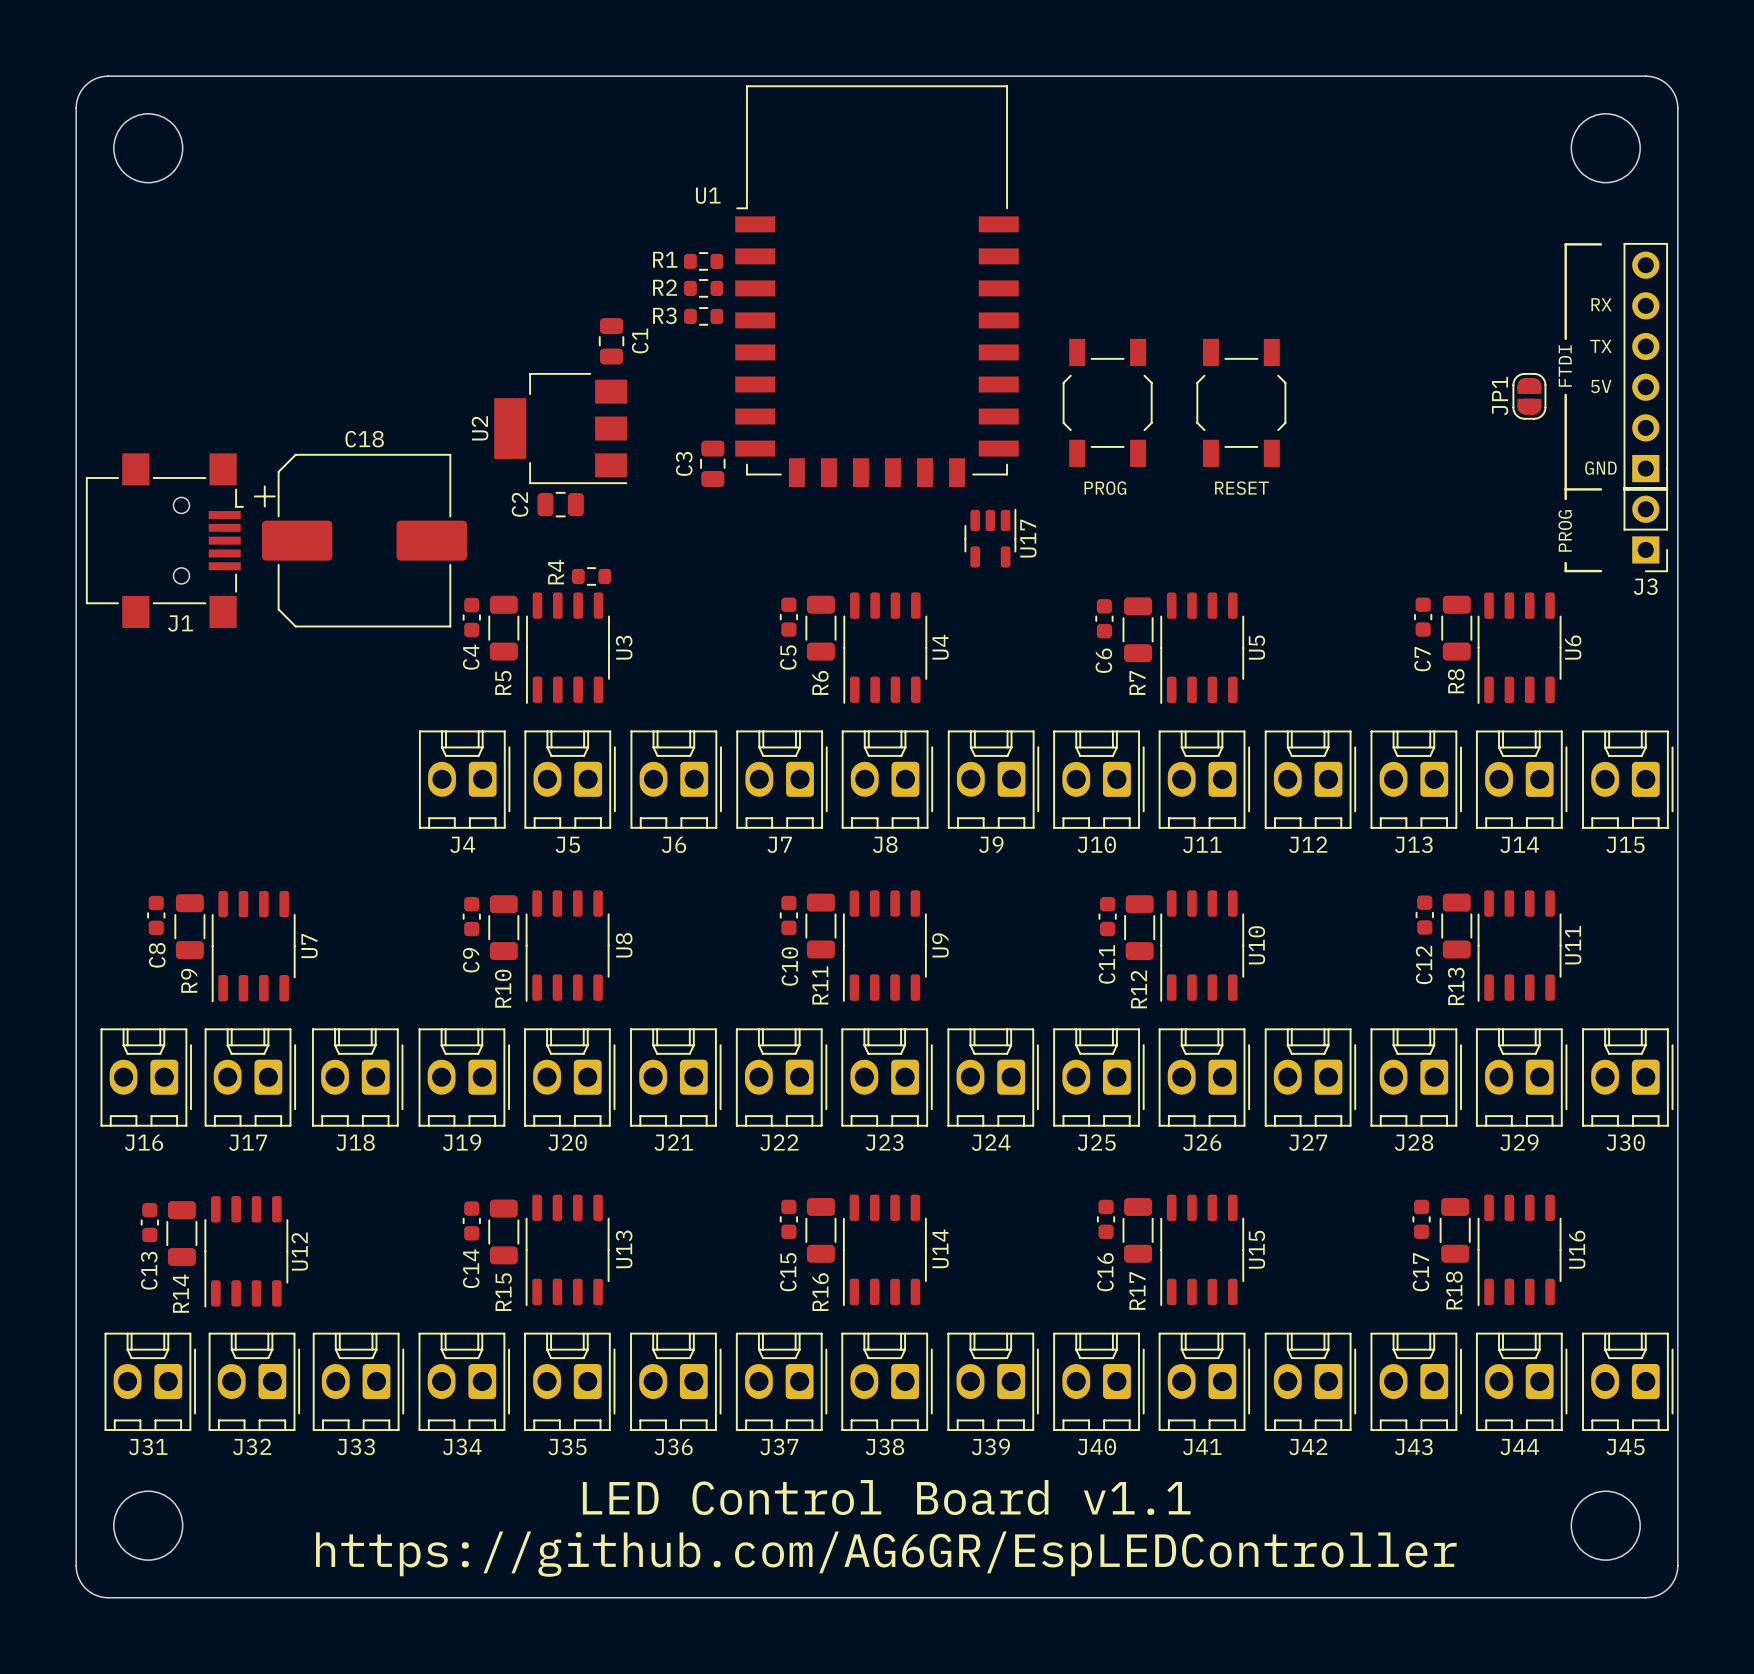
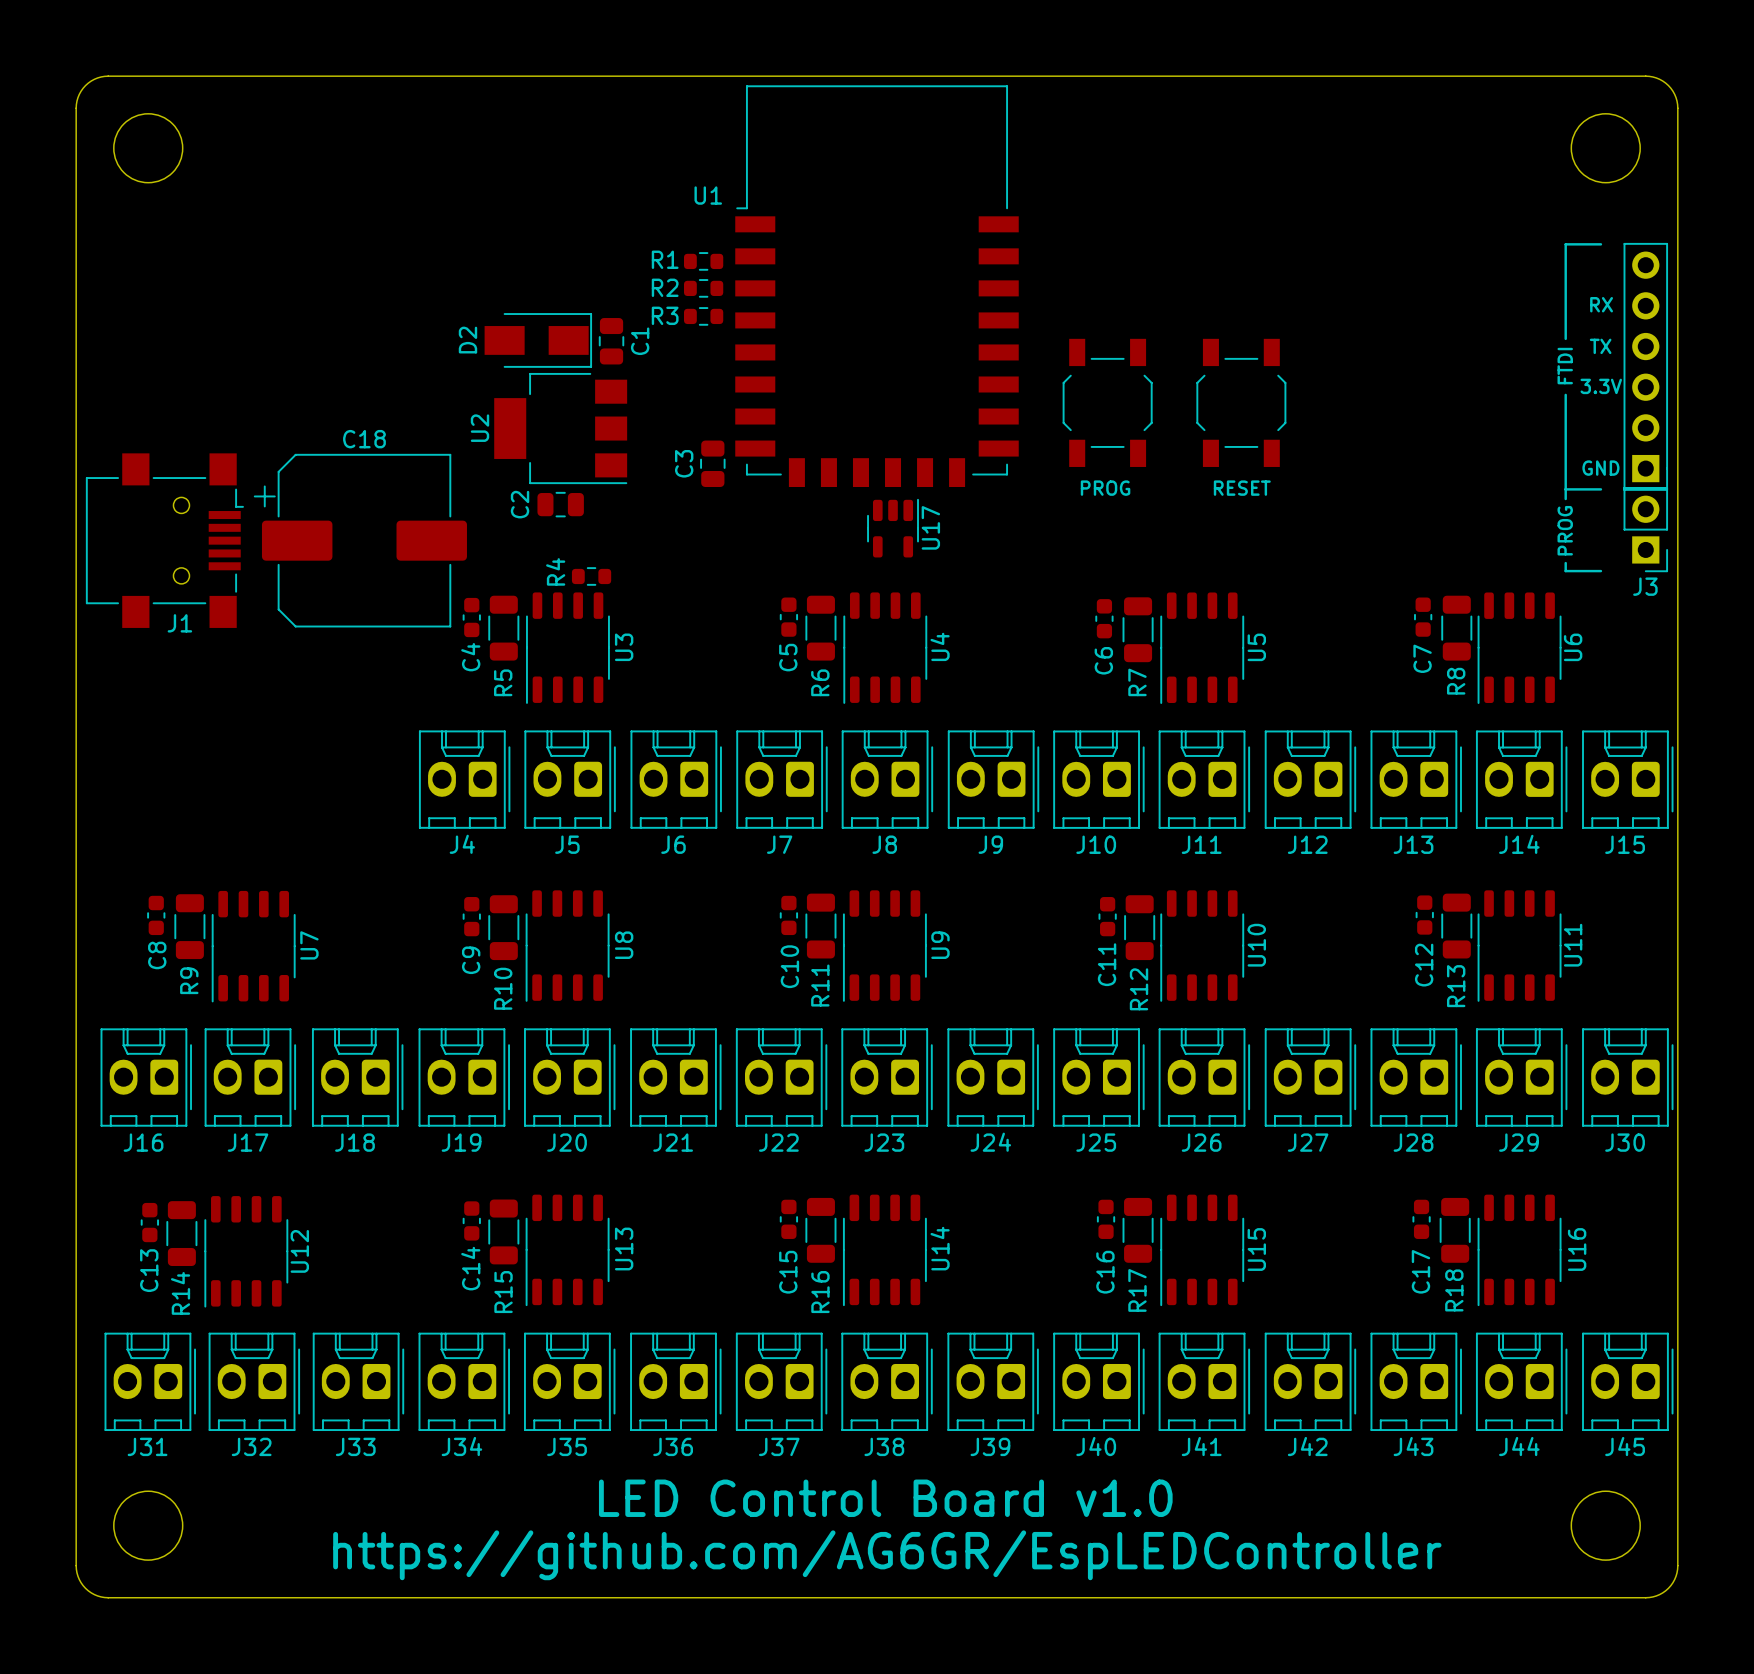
D2: none -> (538, 340)
text: 5V (1601, 386) -> 3.3V (1601, 386)
JP1: (1529, 396) -> none
U17 position: (990, 538) -> (893, 528)
text: LED Control Board v1.1 (886, 1497) -> LED Control Board v1.0 (885, 1498)

